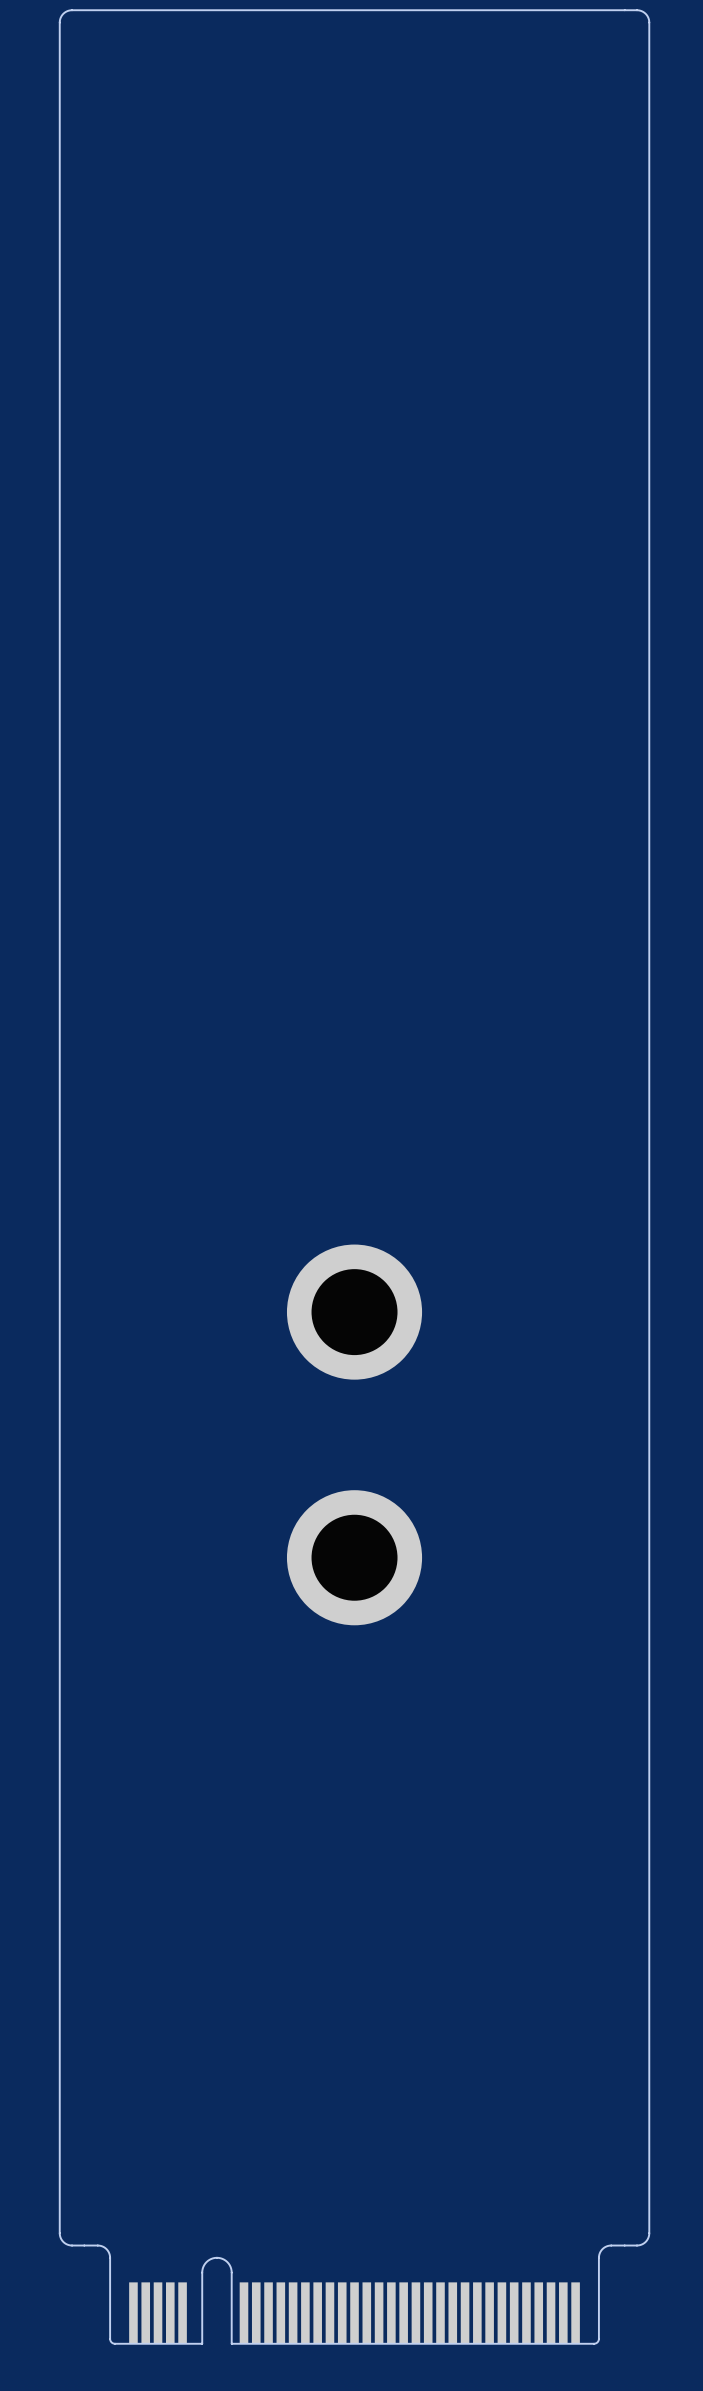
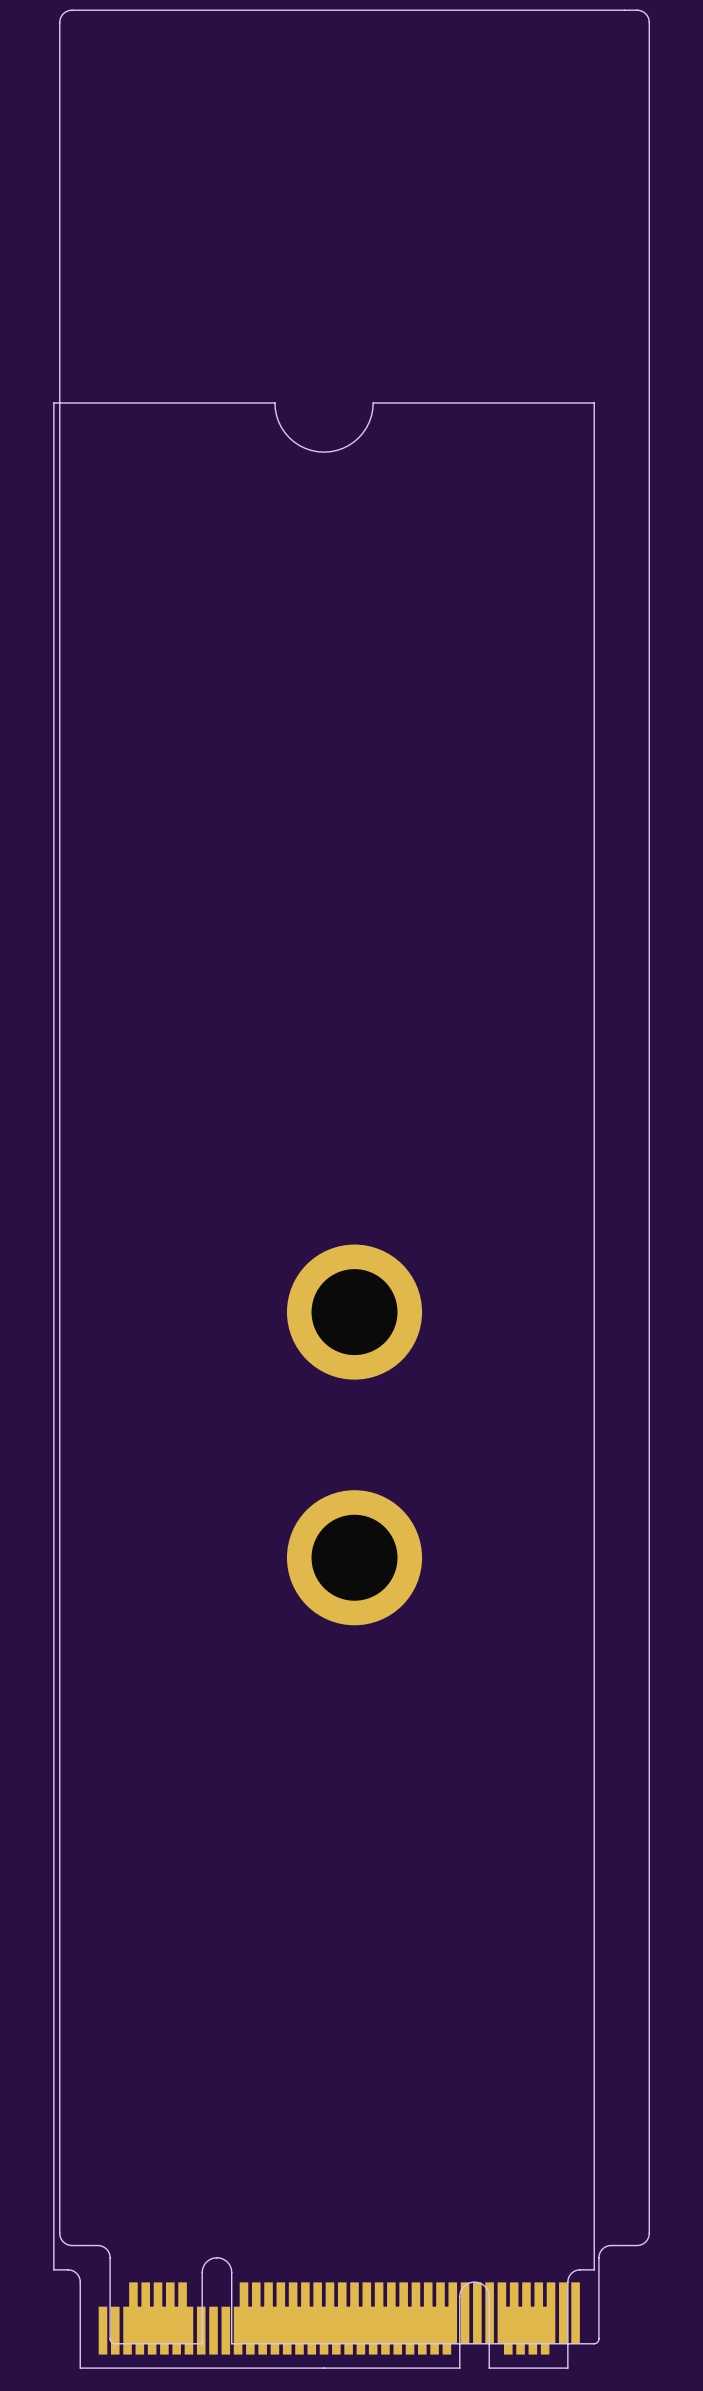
board edge: none -> (594, 2269) (594, 403) (373, 403) (369, 421) (358, 437) (342, 448) (324, 452) (305, 448) (289, 437) (278, 421) (274, 403) (53, 403) (53, 2269)
part: none -> (324, 2318)

